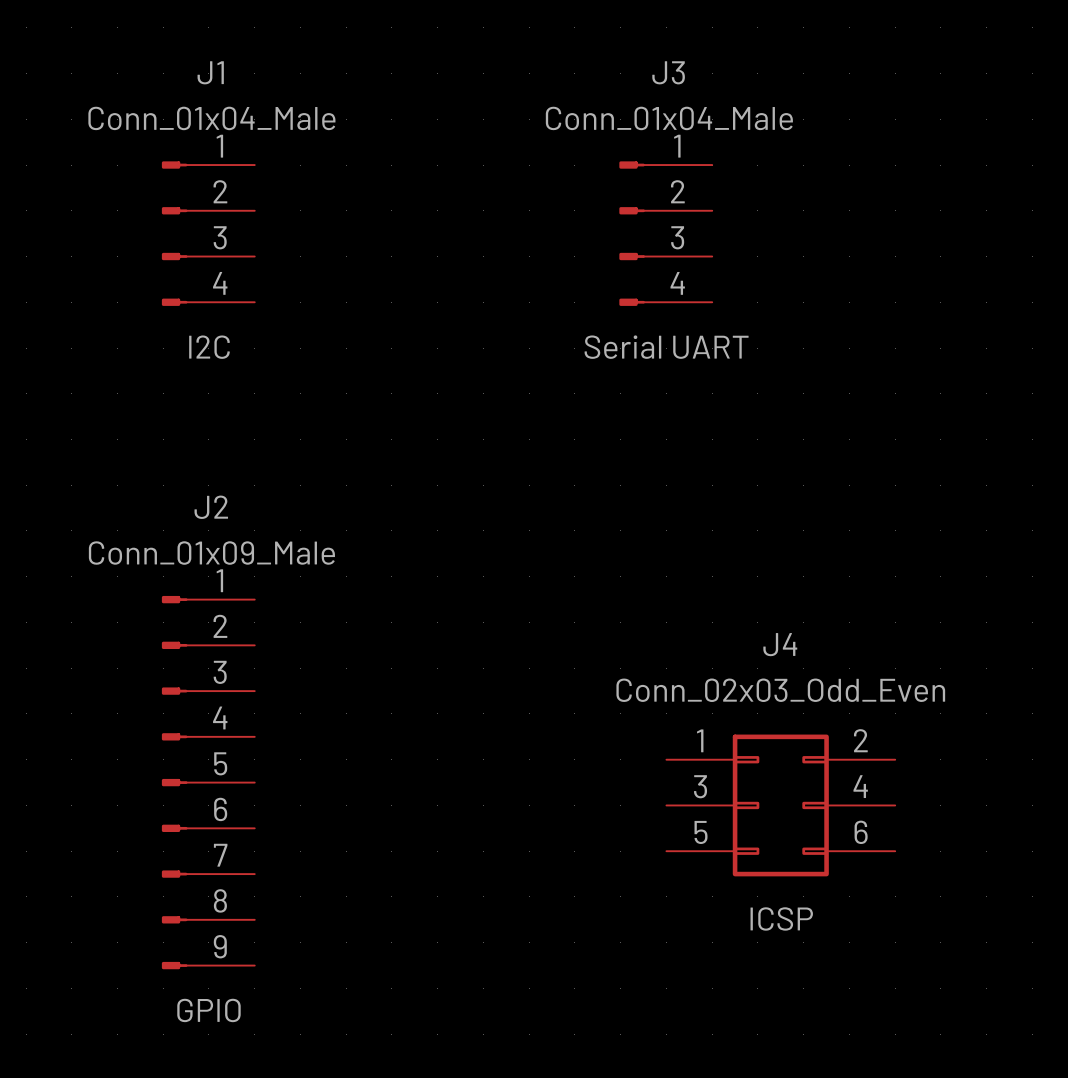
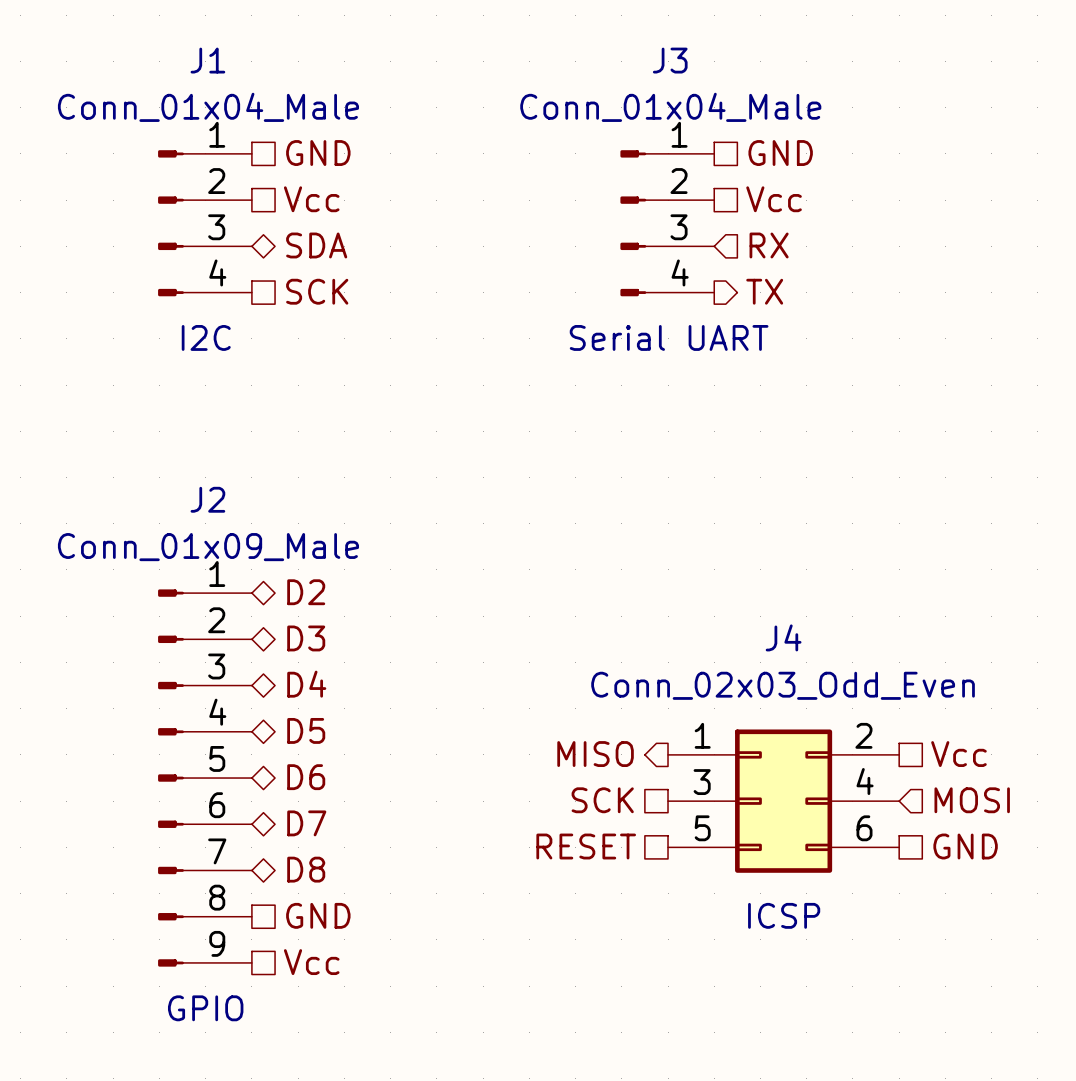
hierarchical label: none -> GND (318, 153)
hierarchical label: none -> GND (780, 153)
hierarchical label: none -> Vcc (311, 199)
hierarchical label: none -> Vcc (774, 199)
hierarchical label: none -> SDA (316, 245)
hierarchical label: none -> RX (769, 245)
hierarchical label: none -> SCK (317, 291)
hierarchical label: none -> TX (764, 291)
hierarchical label: none -> D2 (306, 592)
hierarchical label: none -> D3 (306, 638)
hierarchical label: none -> D4 (306, 684)
hierarchical label: none -> D5 (306, 730)
hierarchical label: none -> MISO (595, 754)
hierarchical label: none -> Vcc (958, 754)
hierarchical label: none -> D6 (306, 777)
hierarchical label: none -> SCK (602, 800)
hierarchical label: none -> MOSI (972, 800)
hierarchical label: none -> D7 (306, 823)
hierarchical label: none -> RESET (586, 846)
hierarchical label: none -> GND (965, 846)
hierarchical label: none -> D8 (306, 869)
hierarchical label: none -> GND (318, 915)
hierarchical label: none -> Vcc (311, 962)

